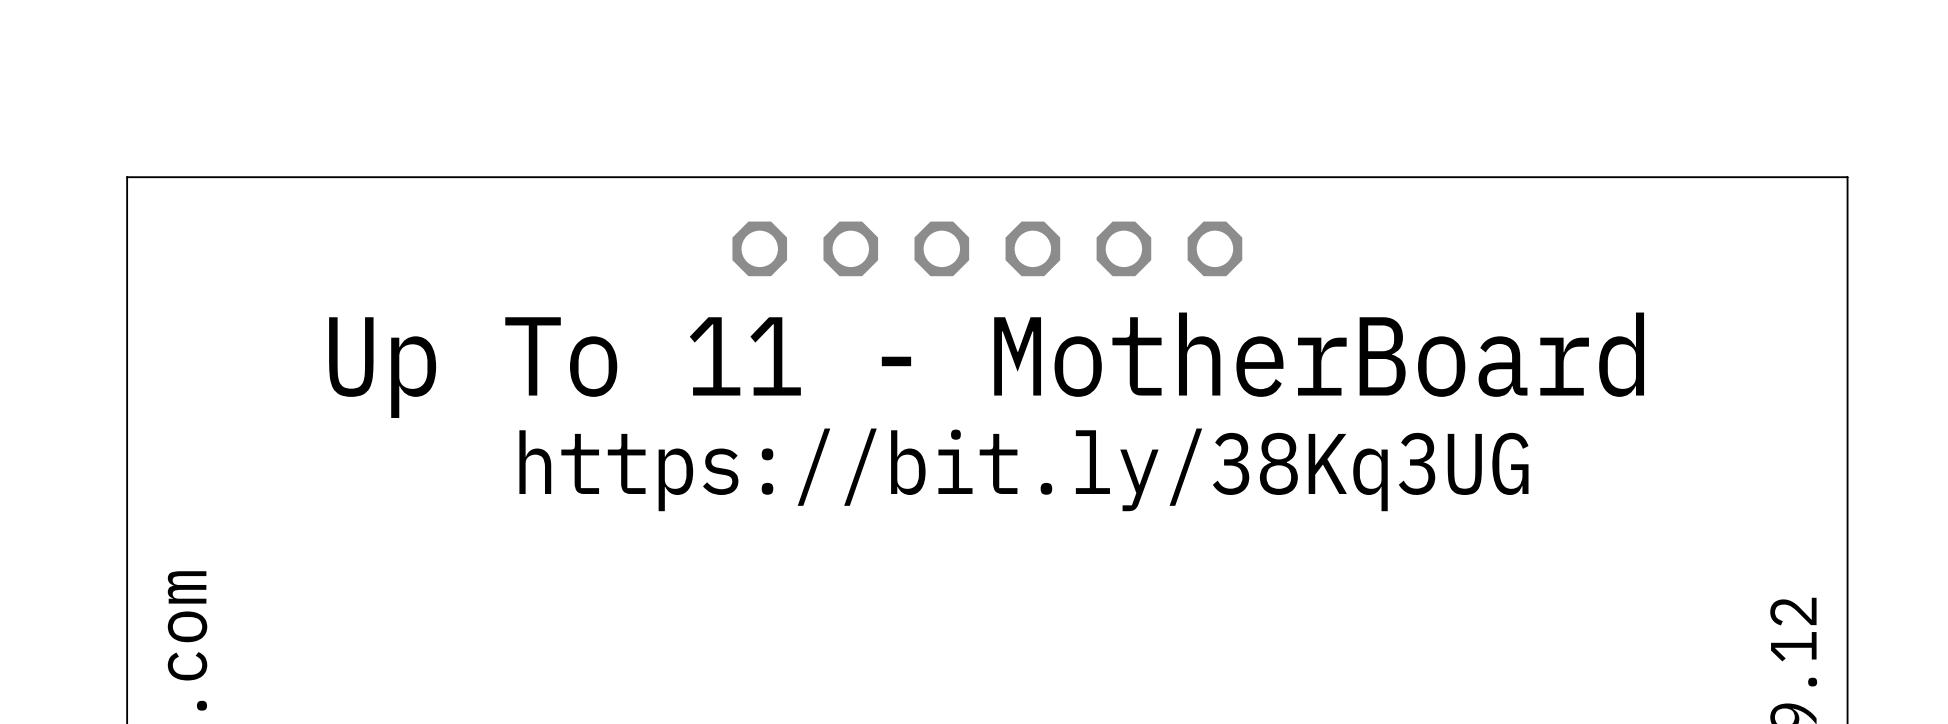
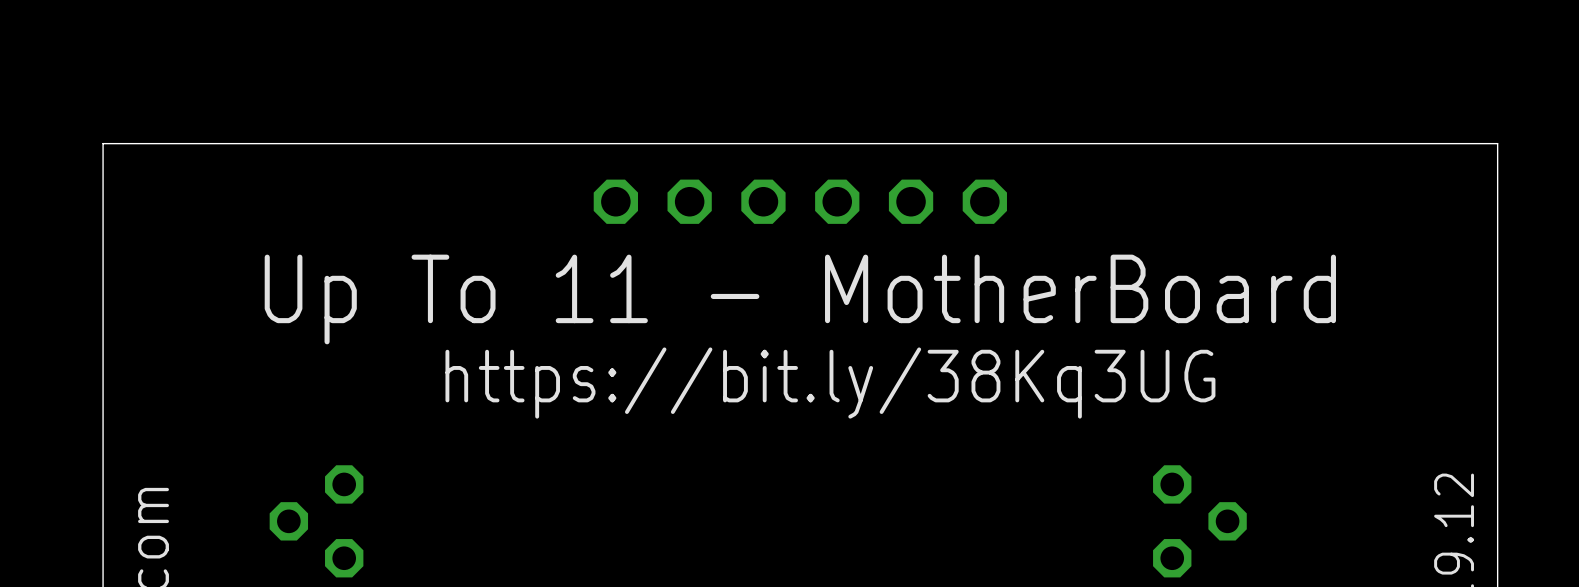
part: none -> (316, 521)
part: none -> (1199, 521)

